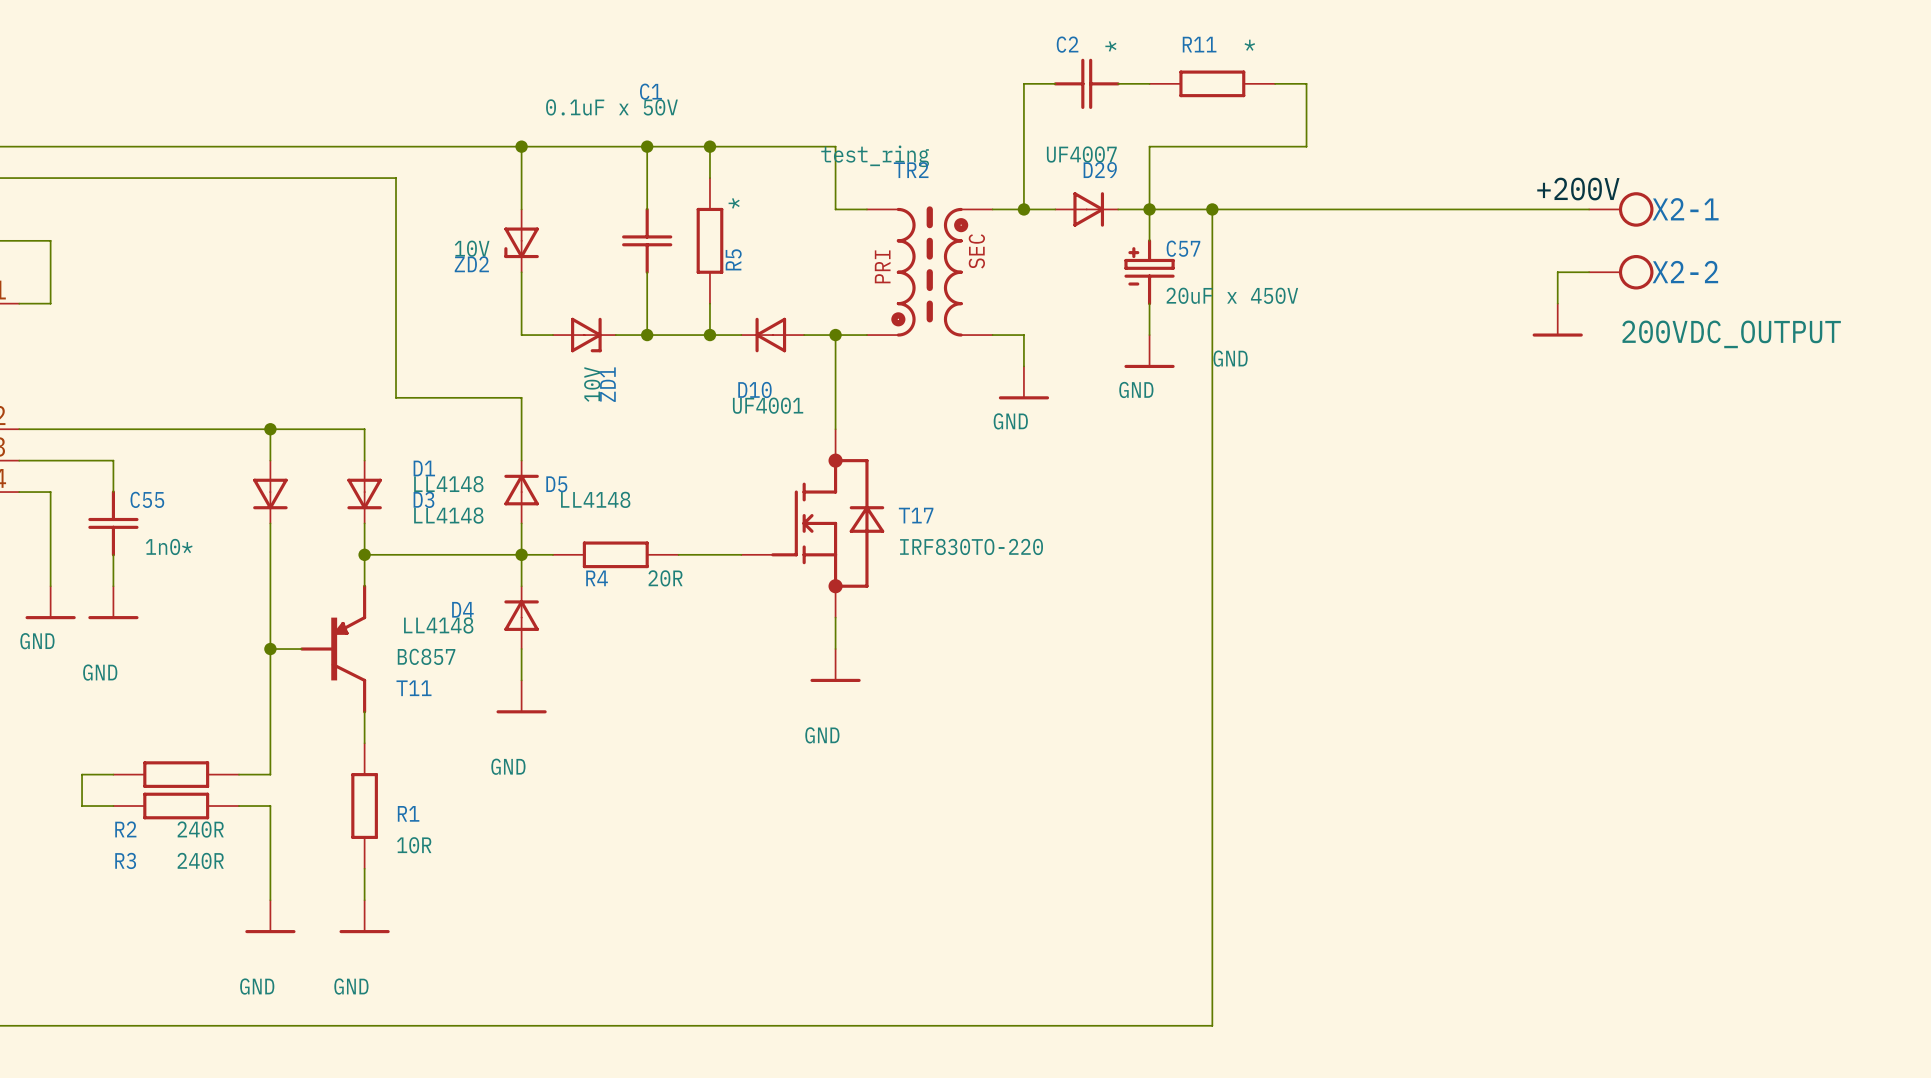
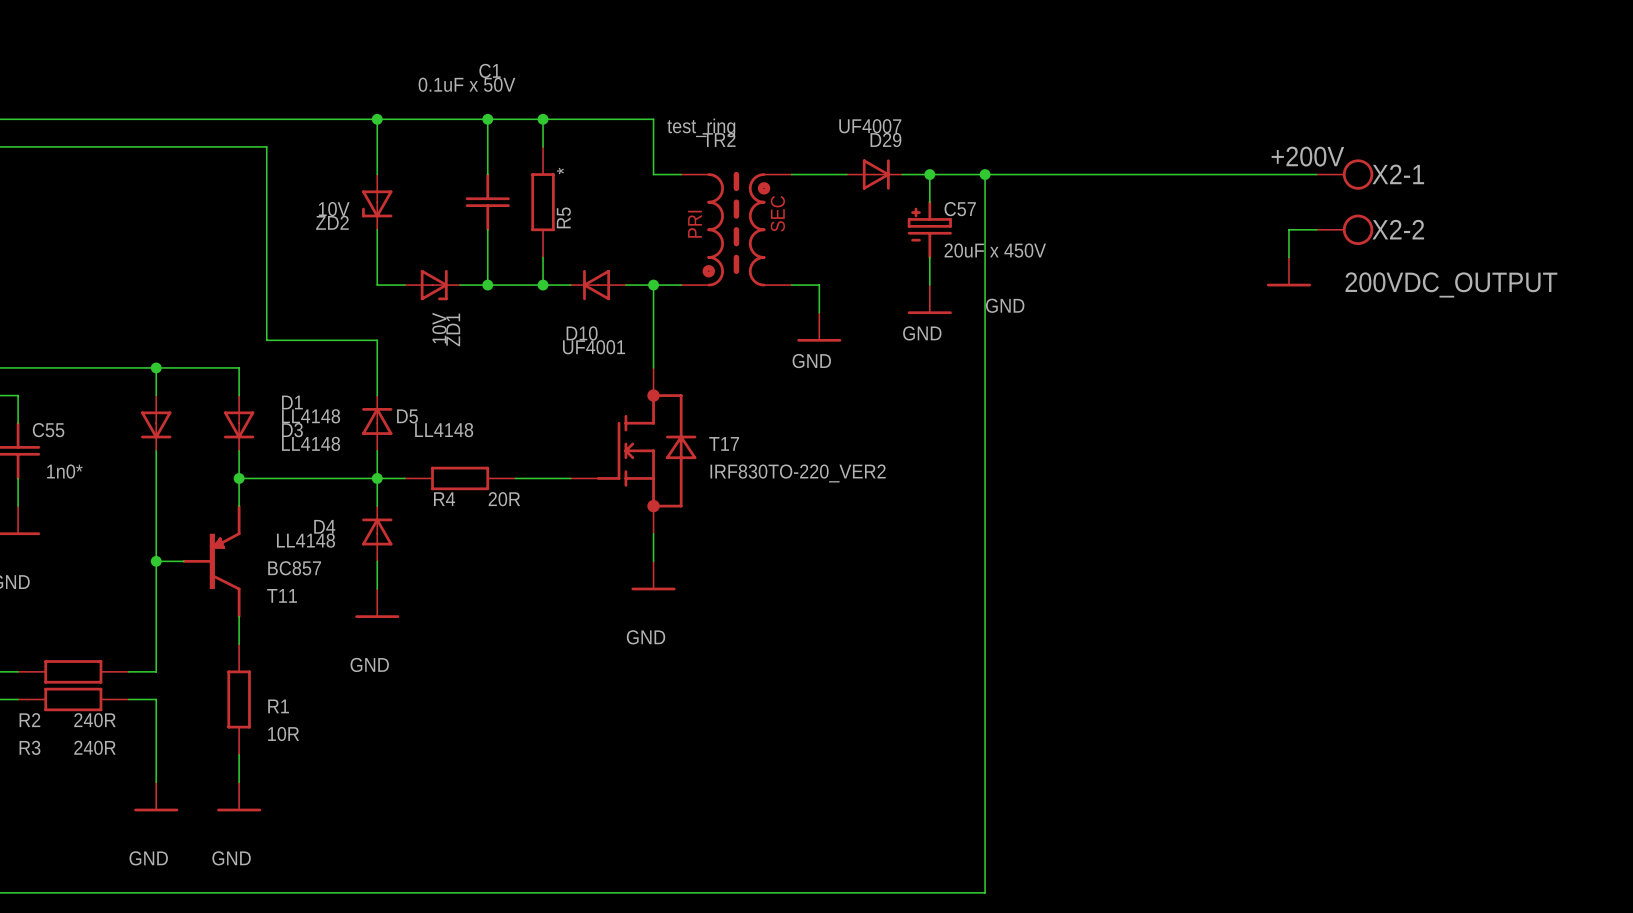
wire: (1055, 83) (1023, 83) (1023, 209) -> none
C2: * (1086, 83) -> none
wire: (1118, 83) (1149, 83) -> none
R11: * (1212, 83) -> none
wire: (1275, 83) (1306, 83) (1306, 146) (1149, 146) (1149, 209) -> none
junction: (1023, 209) -> none
T17 value: IRF830TO-220 (971, 546) -> IRF830TO-220_VER2 (798, 473)

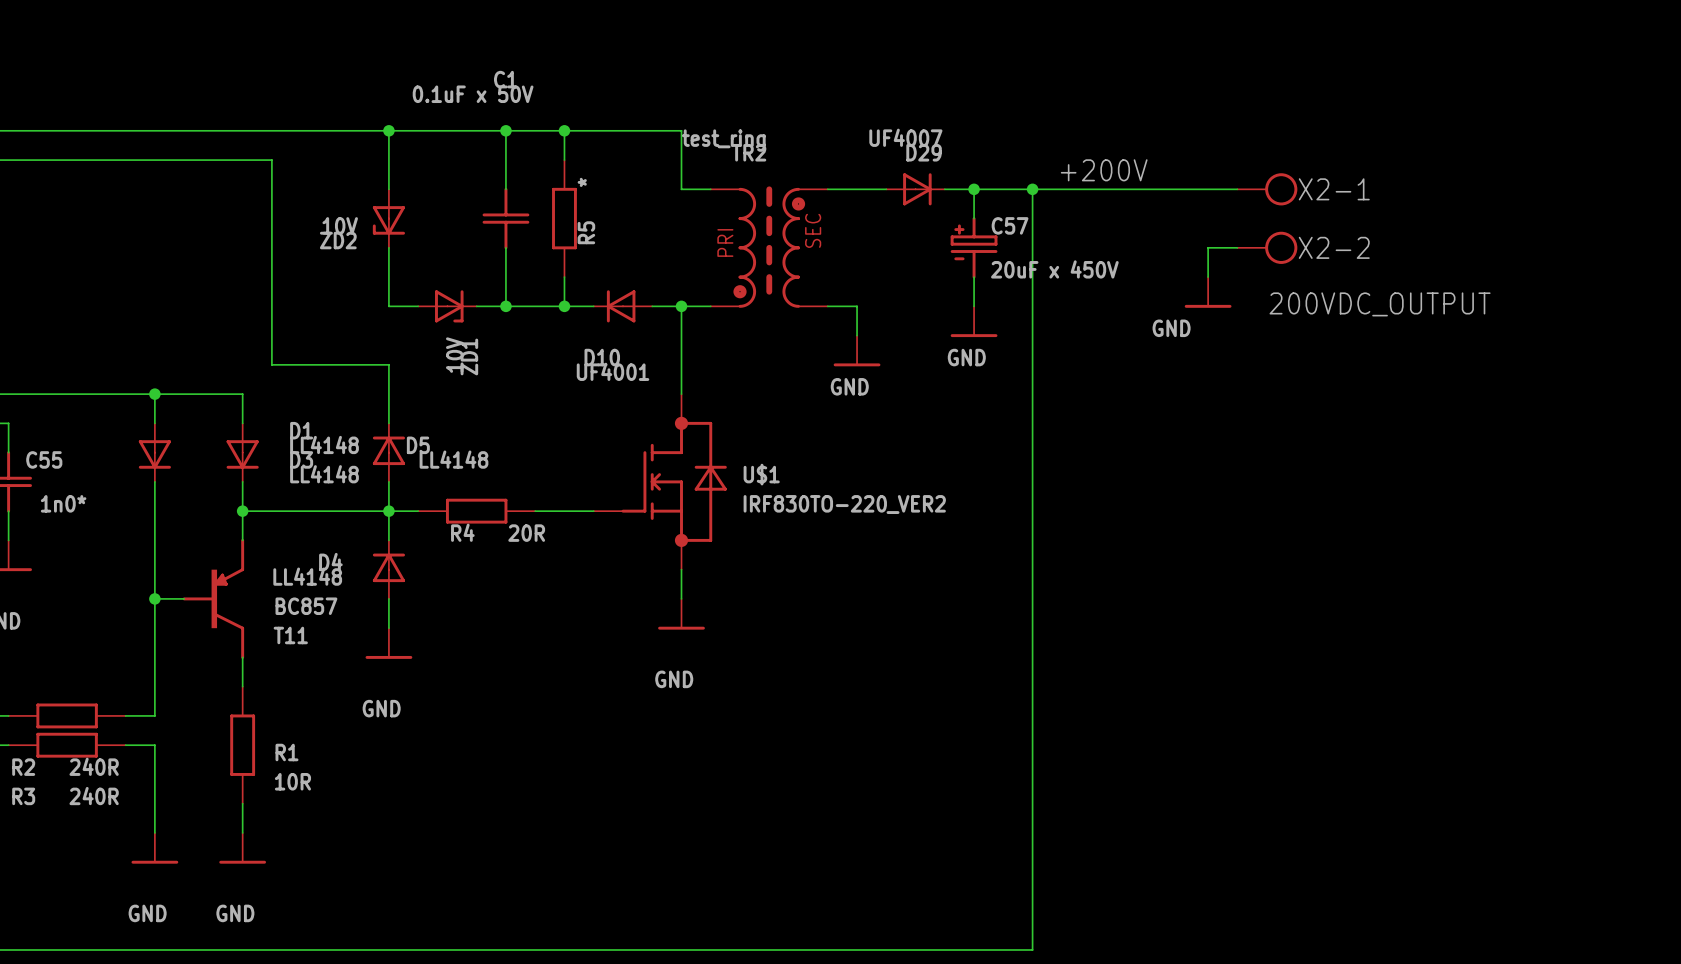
label position: +200V (1307, 156) -> +200V (1104, 170)
wire: (1178, 174) (1316, 174) -> none
X2-1 position: (1344, 174) -> (1267, 189)
wire: (1316, 229) (1288, 229) (1288, 257) -> (1237, 247) (1208, 247) (1208, 277)
X2-2 position: (1344, 229) -> (1267, 247)
power symbol position: GND (1288, 271) -> GND (1208, 292)
power symbol text position: GND (1005, 305) -> GND (1171, 328)
T17 name: T17 (724, 443) -> U$1 (761, 474)

